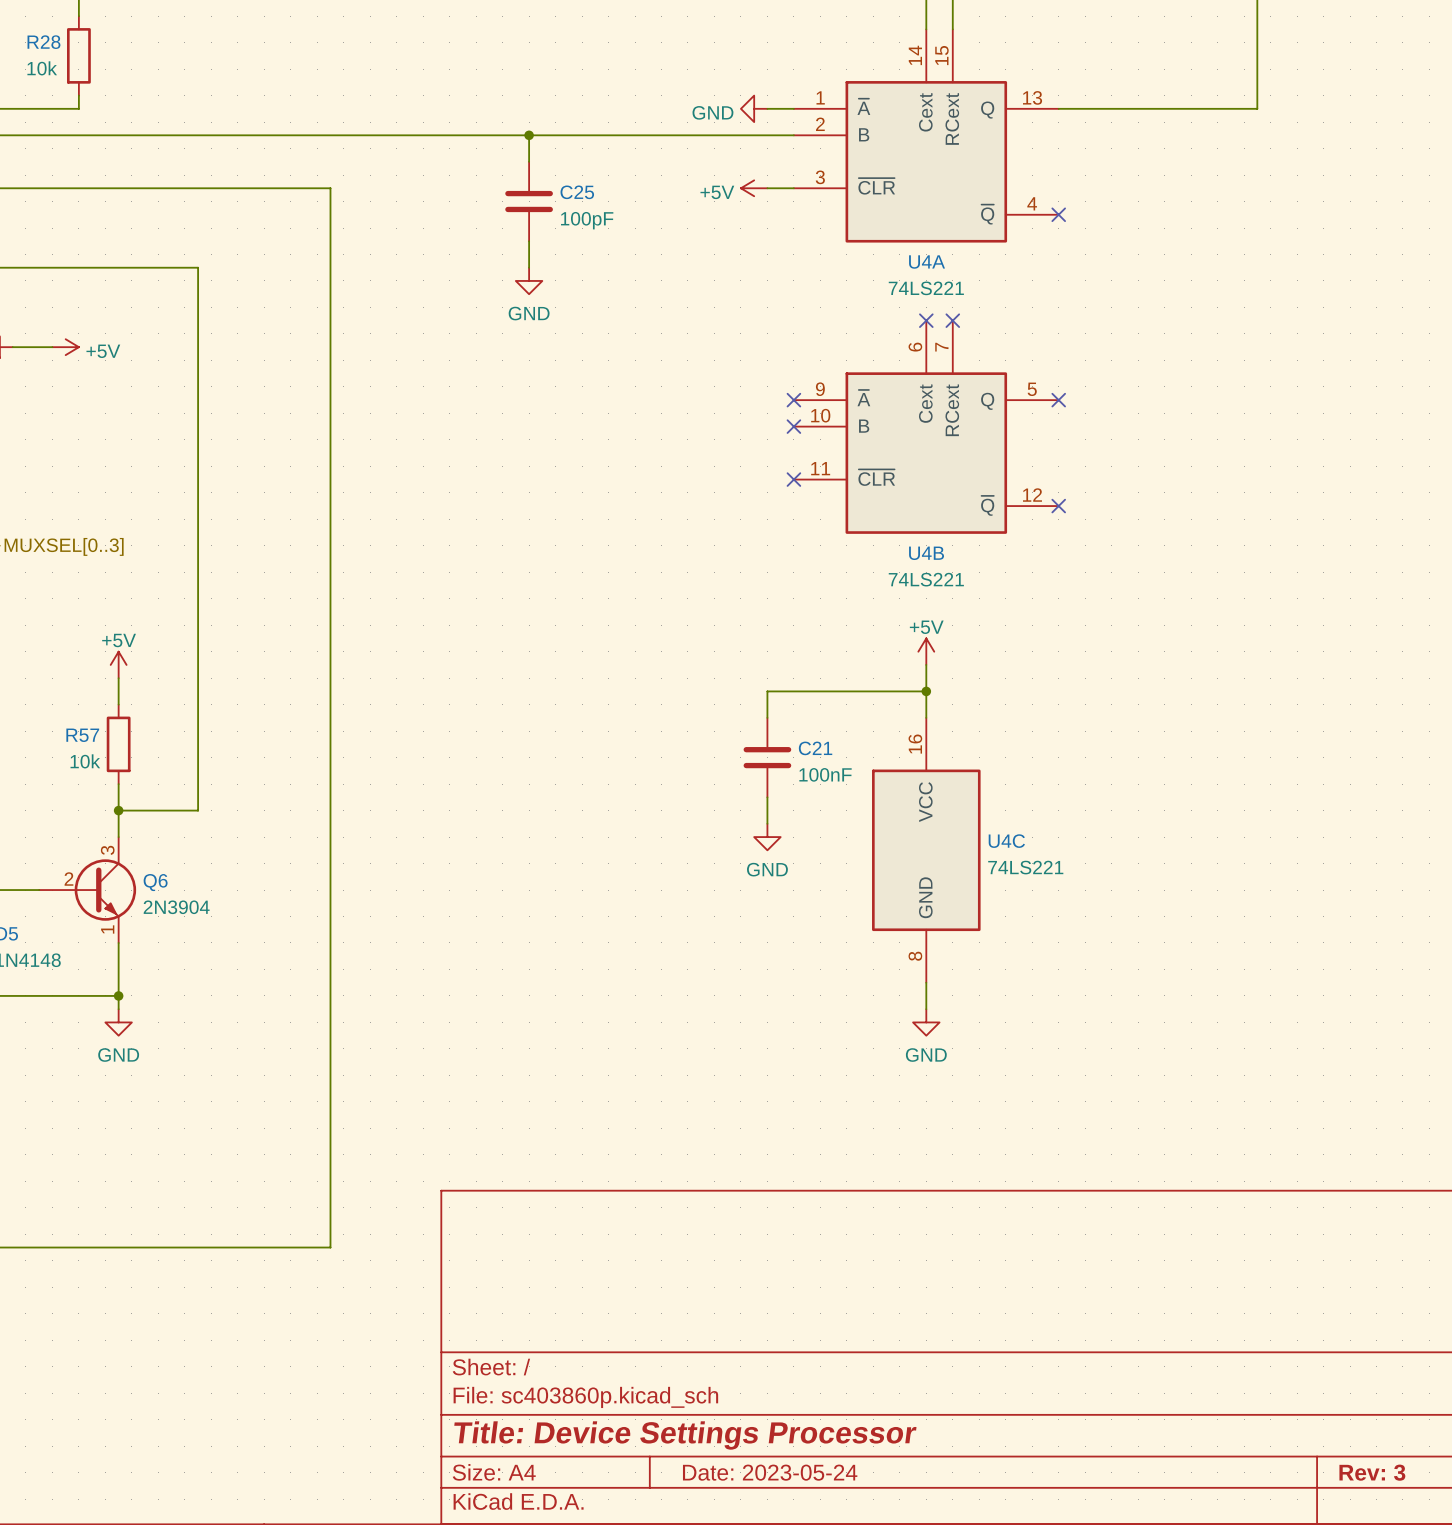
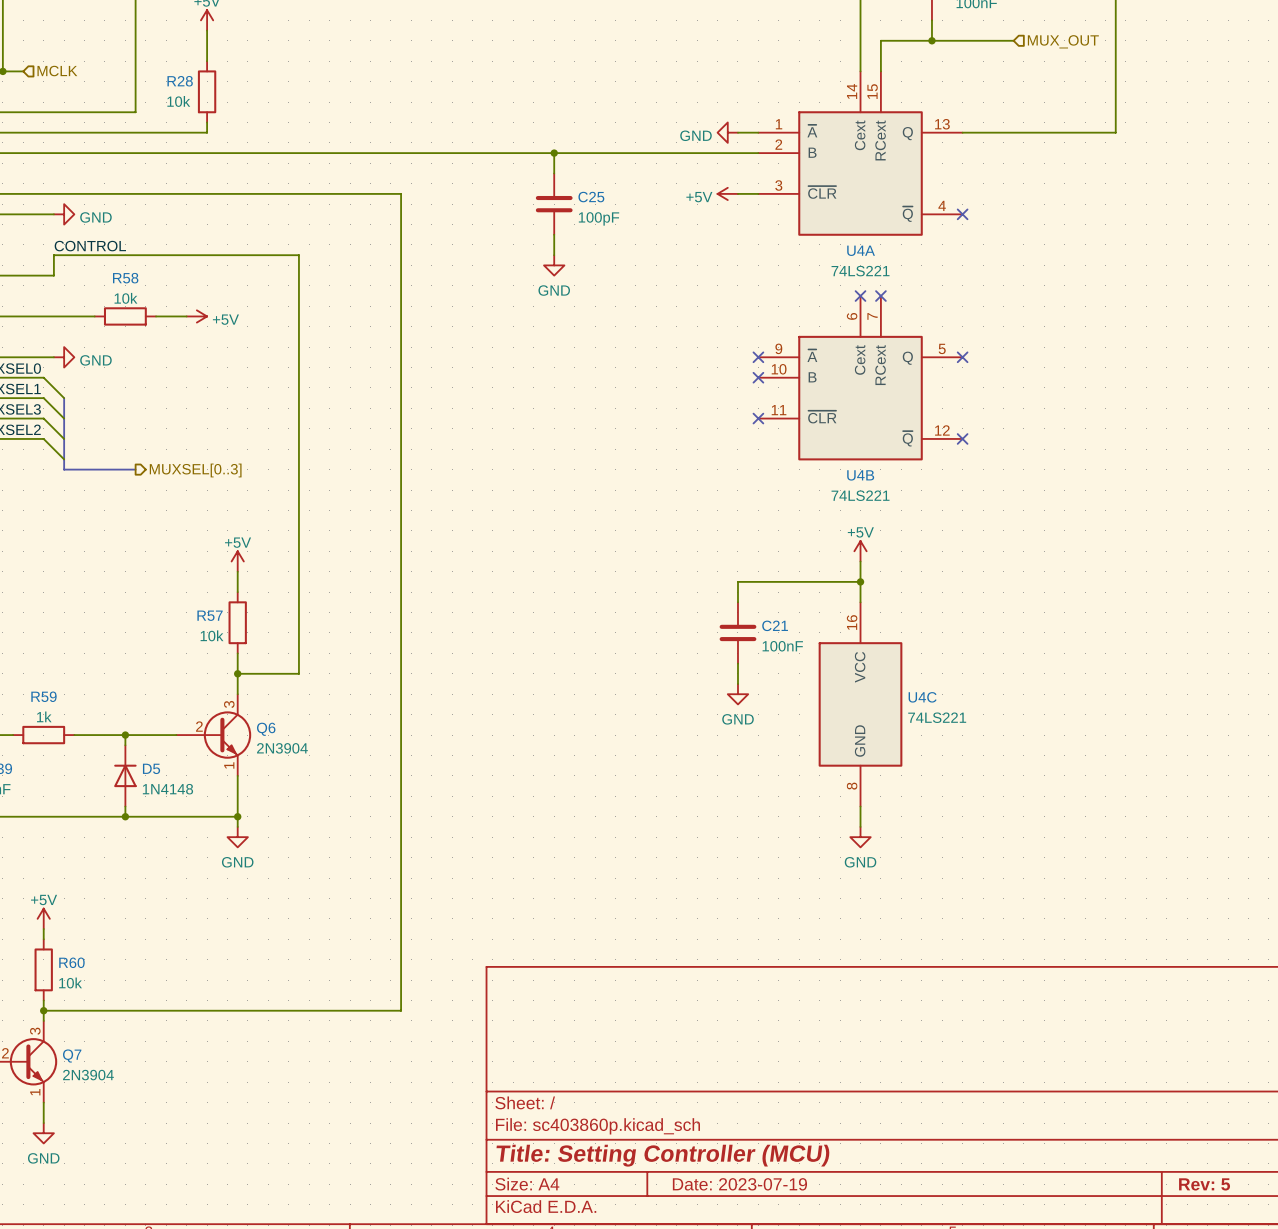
title block: Title: Device Settings Processor (685, 1435) -> Title: Setting Controller (MCU) (663, 1155)
title block: Date: 2023-05-24 (770, 1472) -> Date: 2023-07-19 (739, 1184)
title block: Rev: 3 (1372, 1472) -> Rev: 5 (1204, 1184)

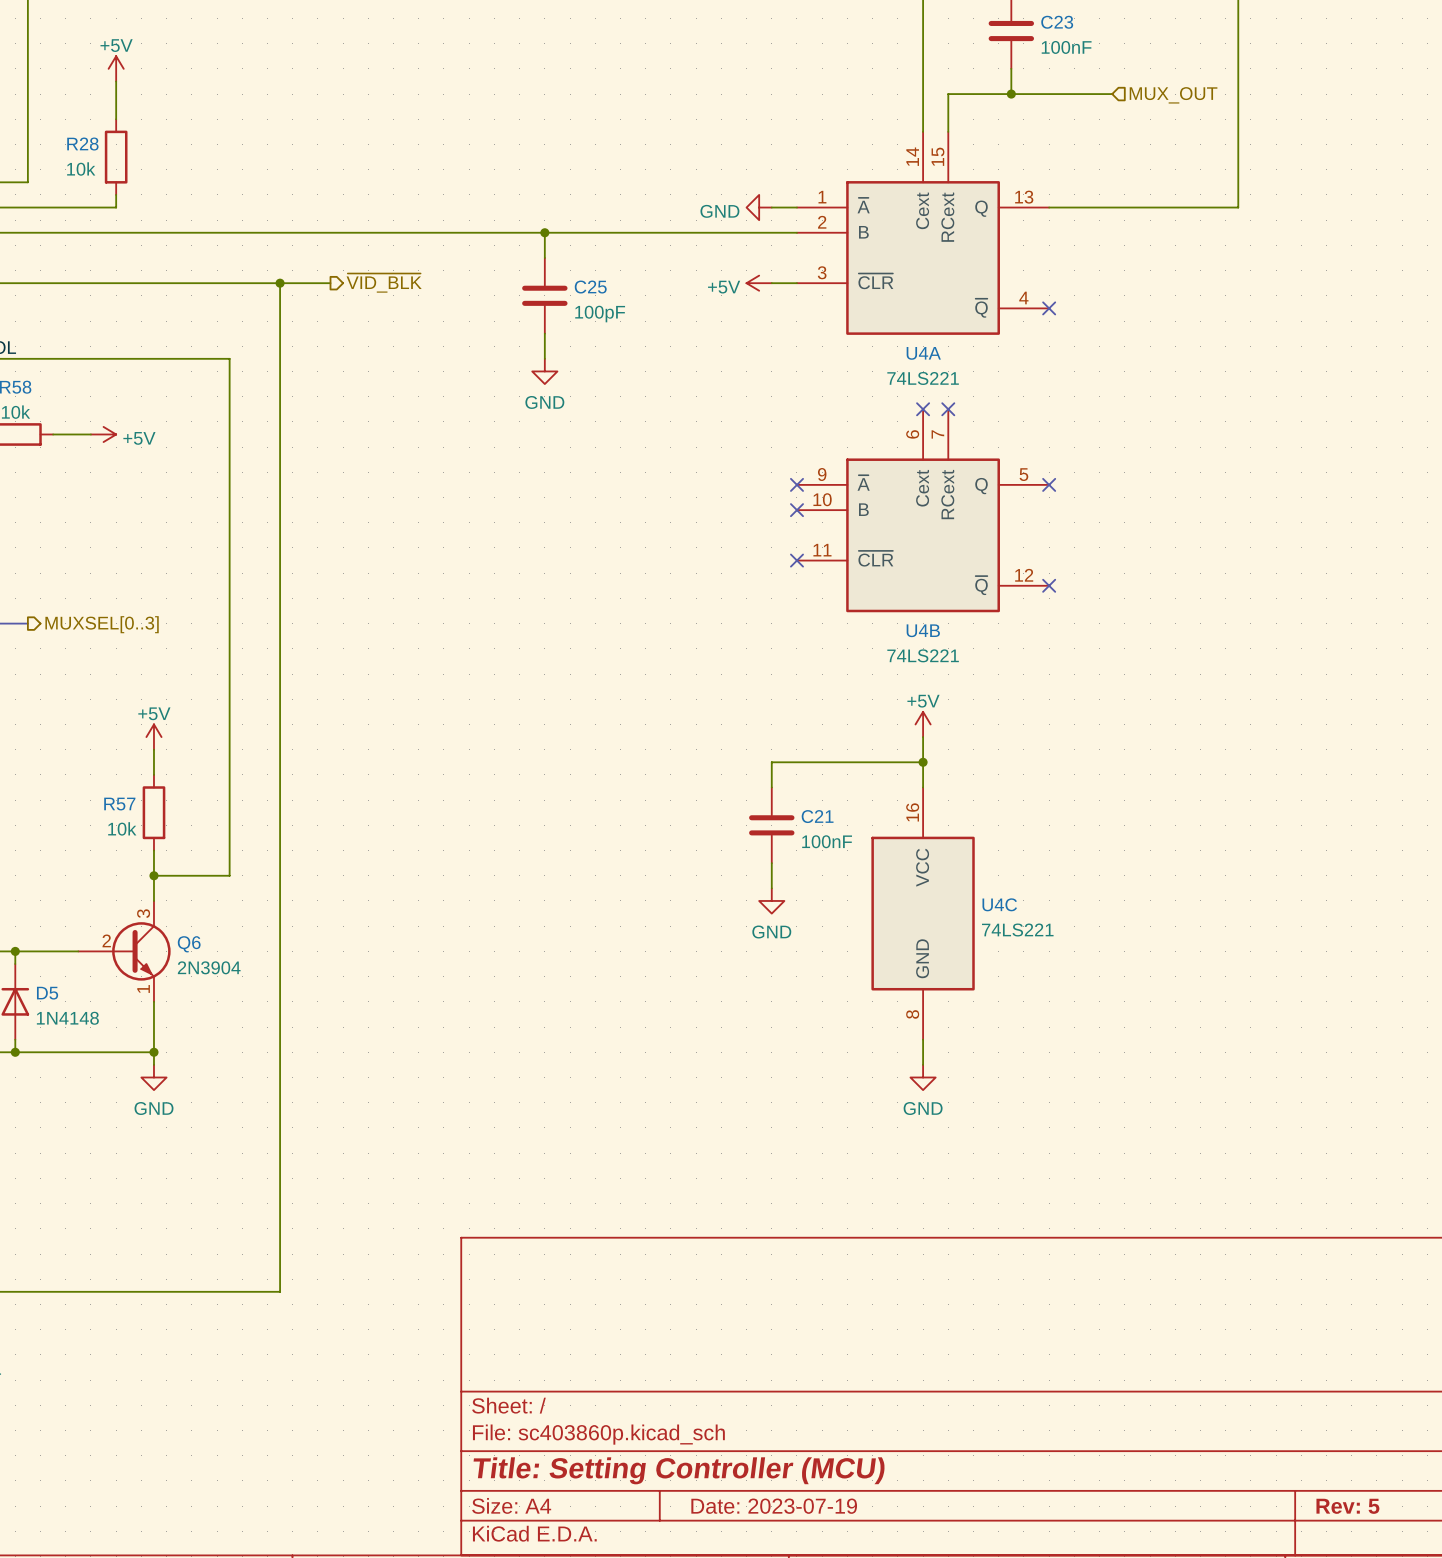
junction: none -> (280, 283)
wire: (380, 193) (401, 193) (401, 1010) (339, 1010) -> (280, 283) (280, 1291)
hierarchical label: none -> ~{VID_BLK} (384, 283)

